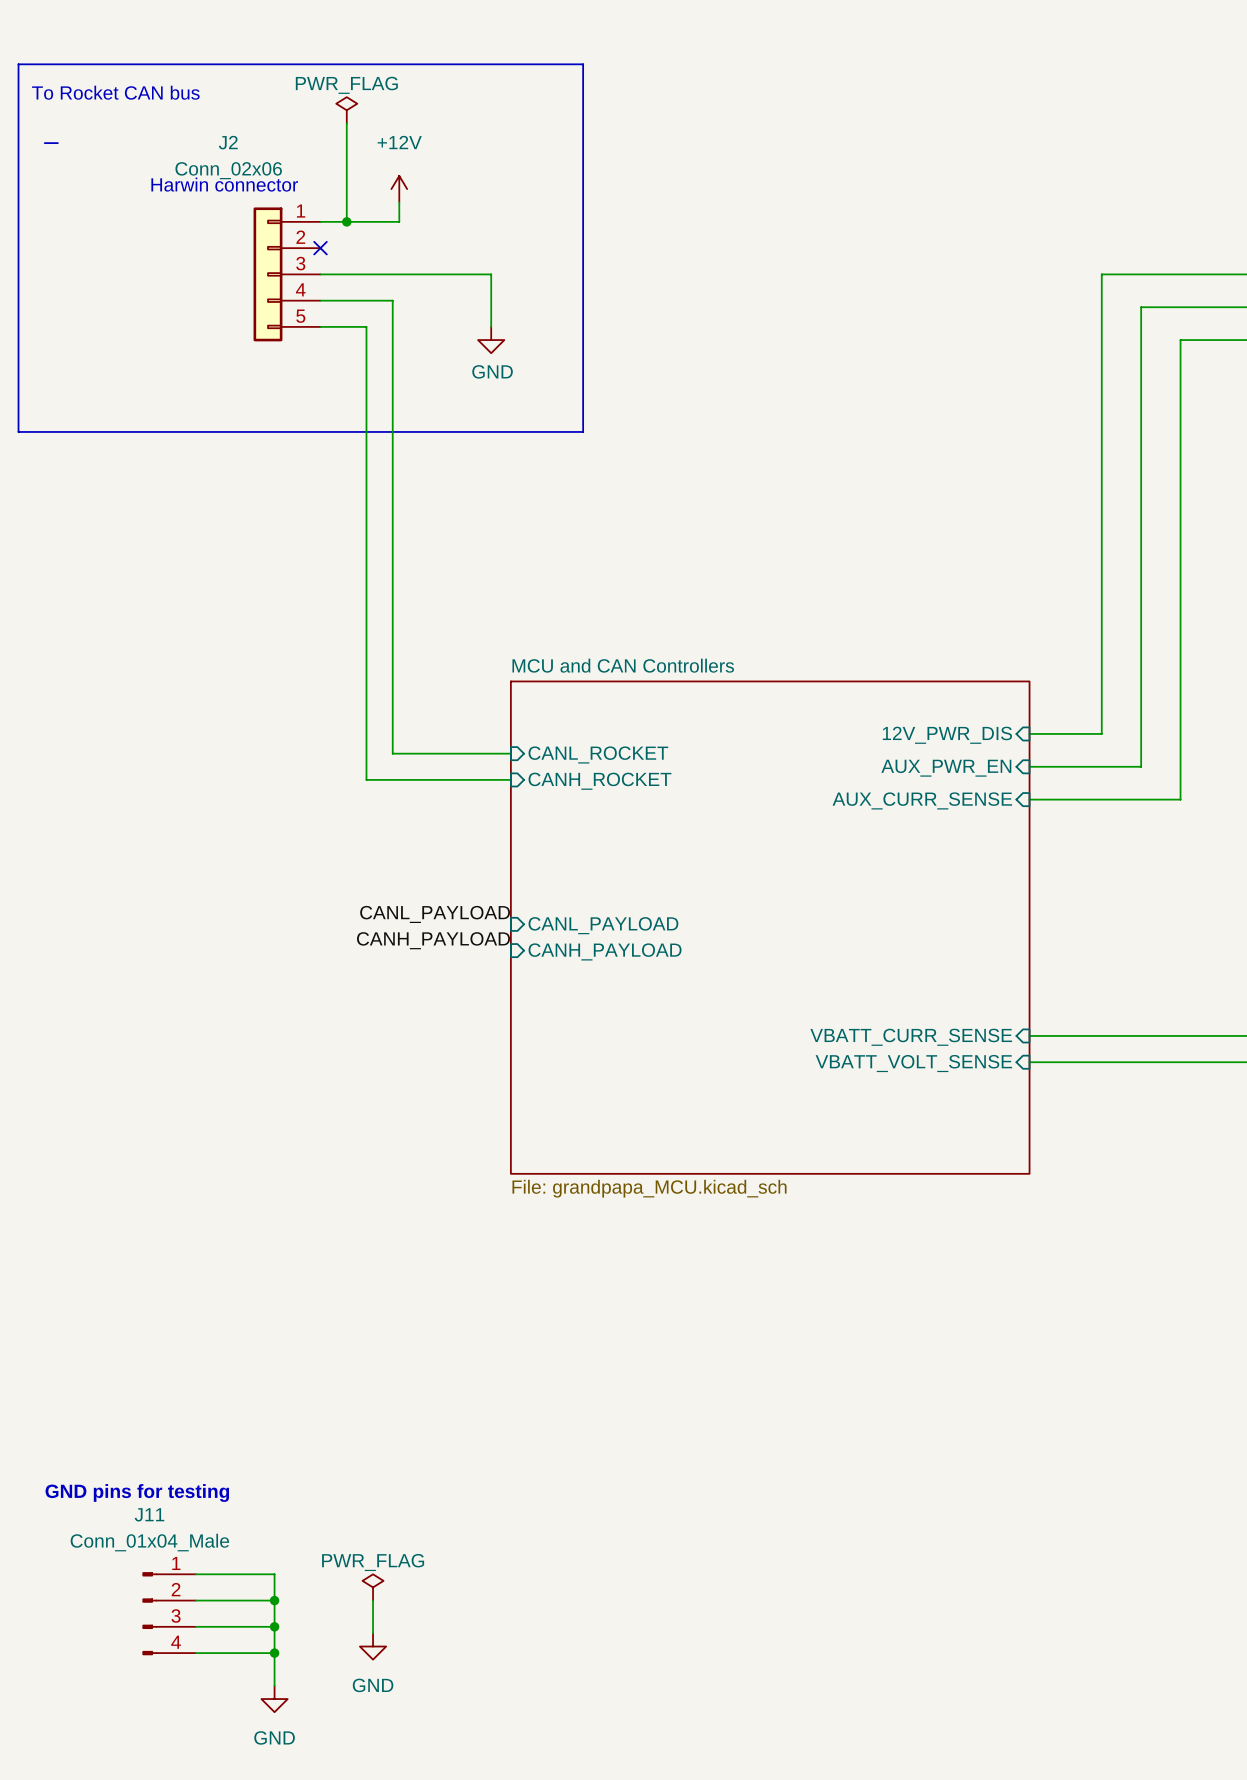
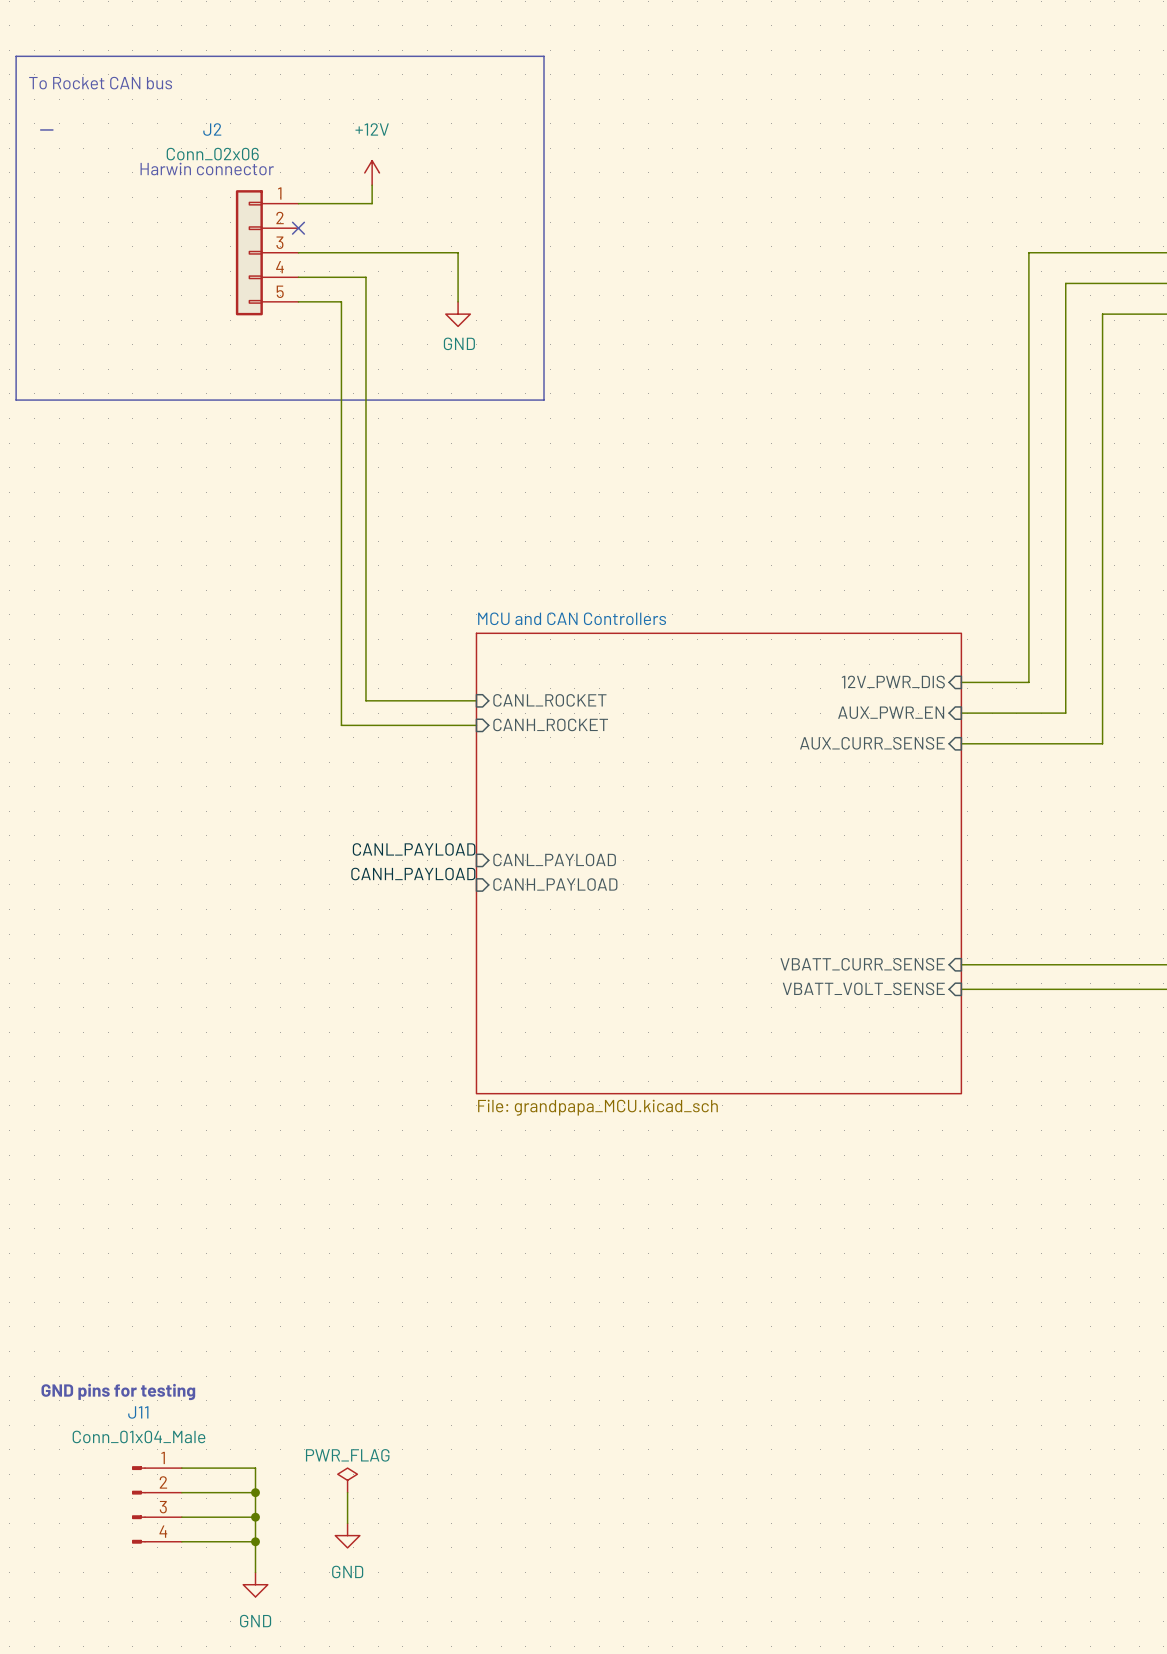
power symbol: PWR_FLAG (346, 110) -> none
wire: (346, 123) (346, 221) -> none
junction: (346, 221) -> none

